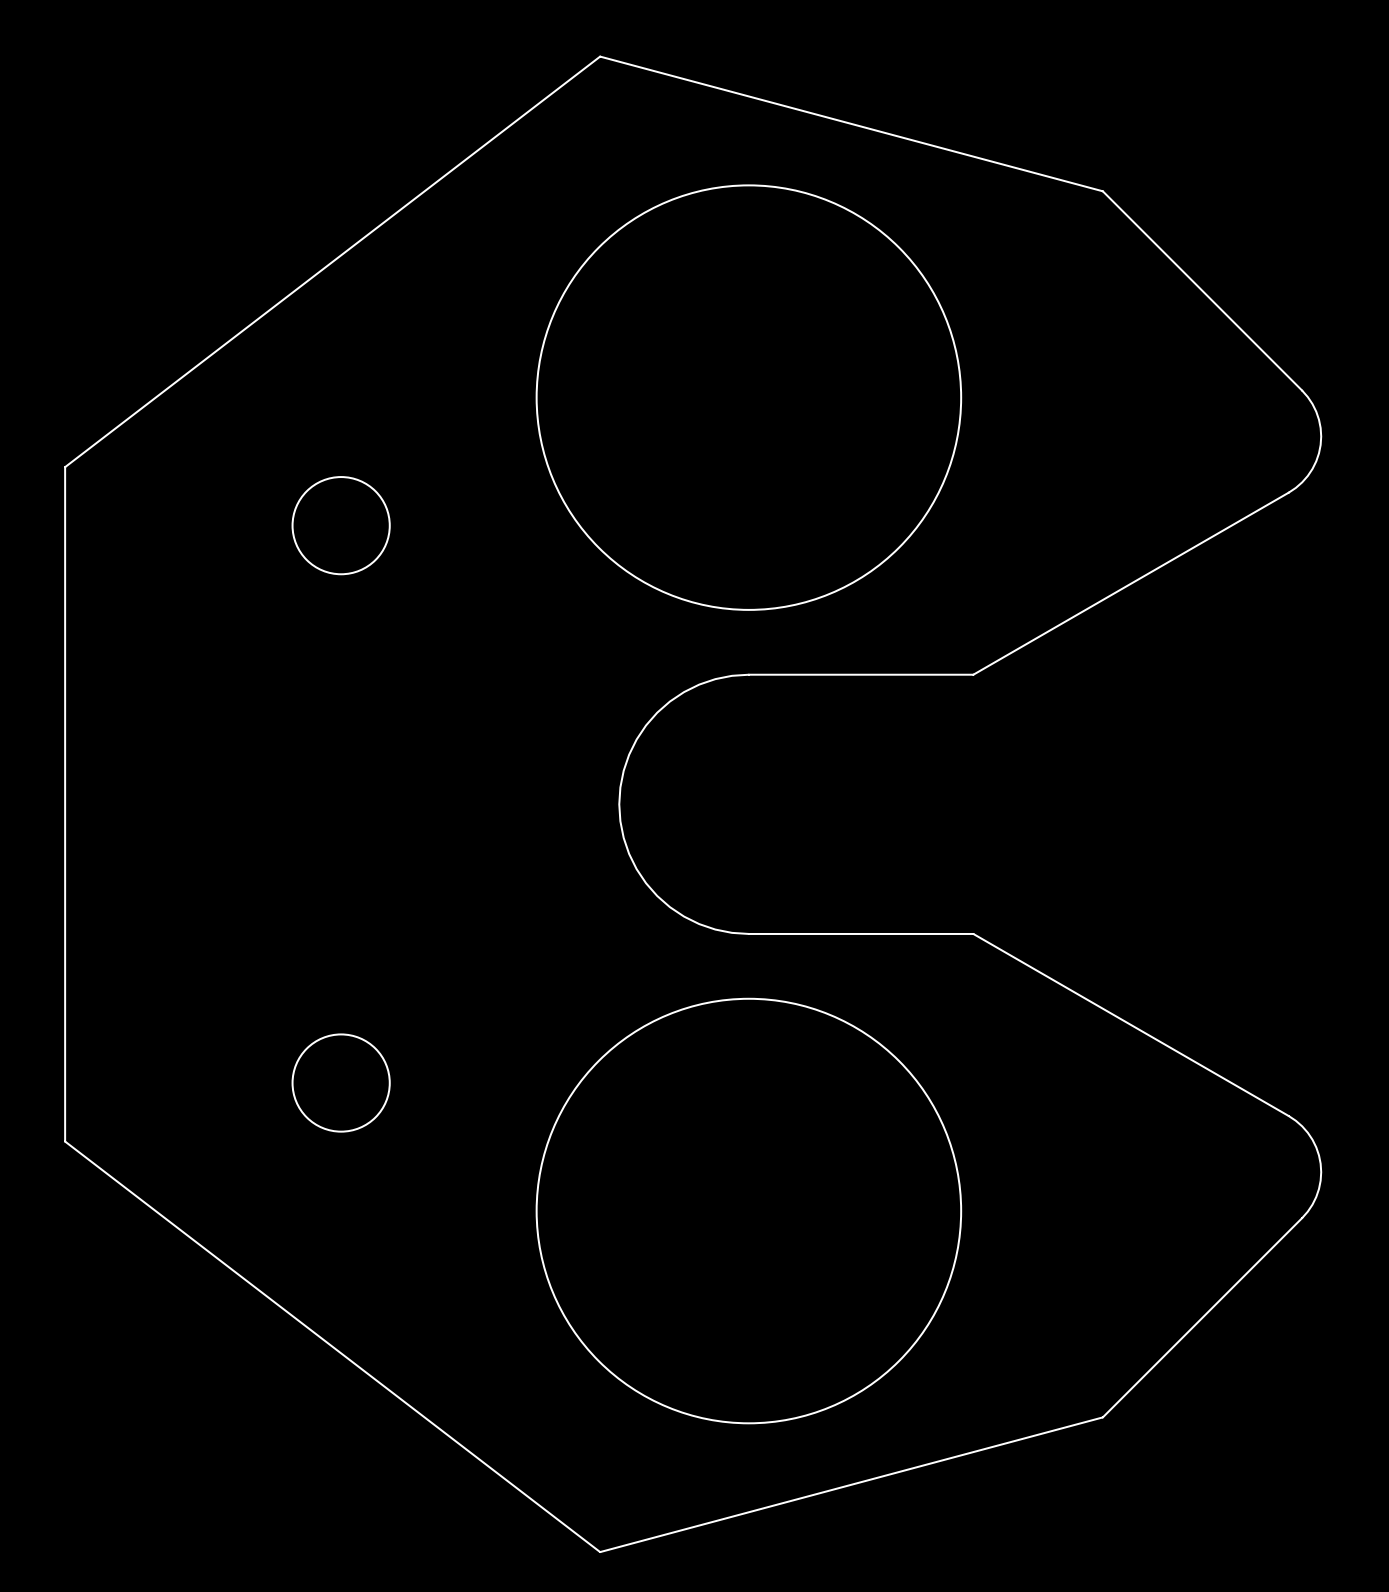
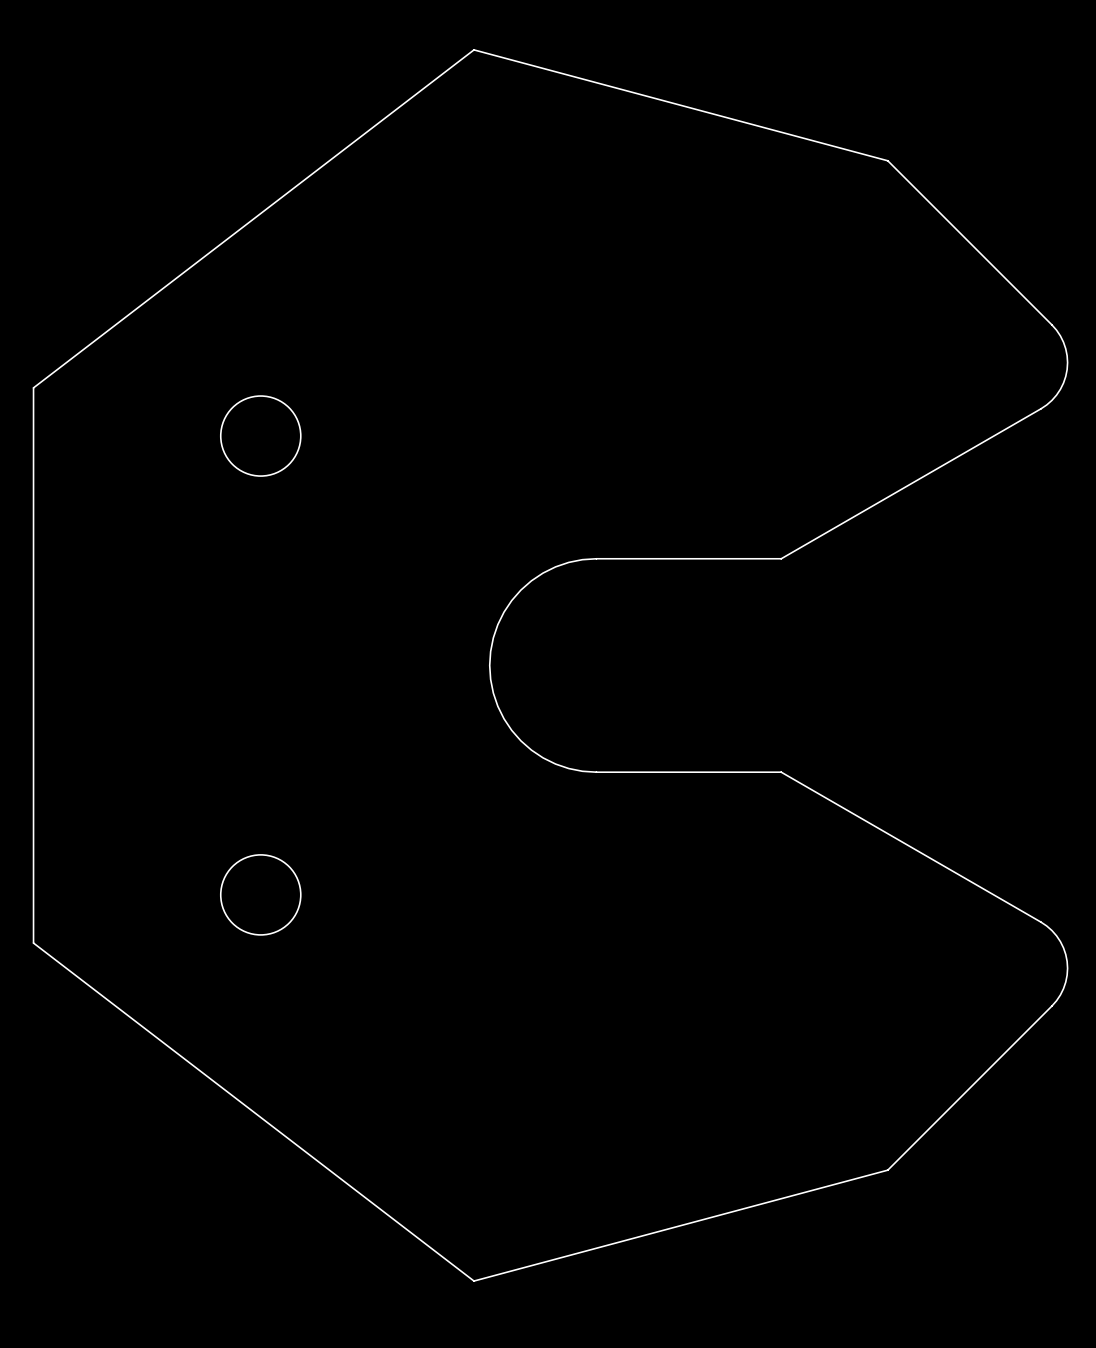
round board edge: [536, 185, 962, 610] -> none
round board edge: [536, 998, 962, 1424] -> none

